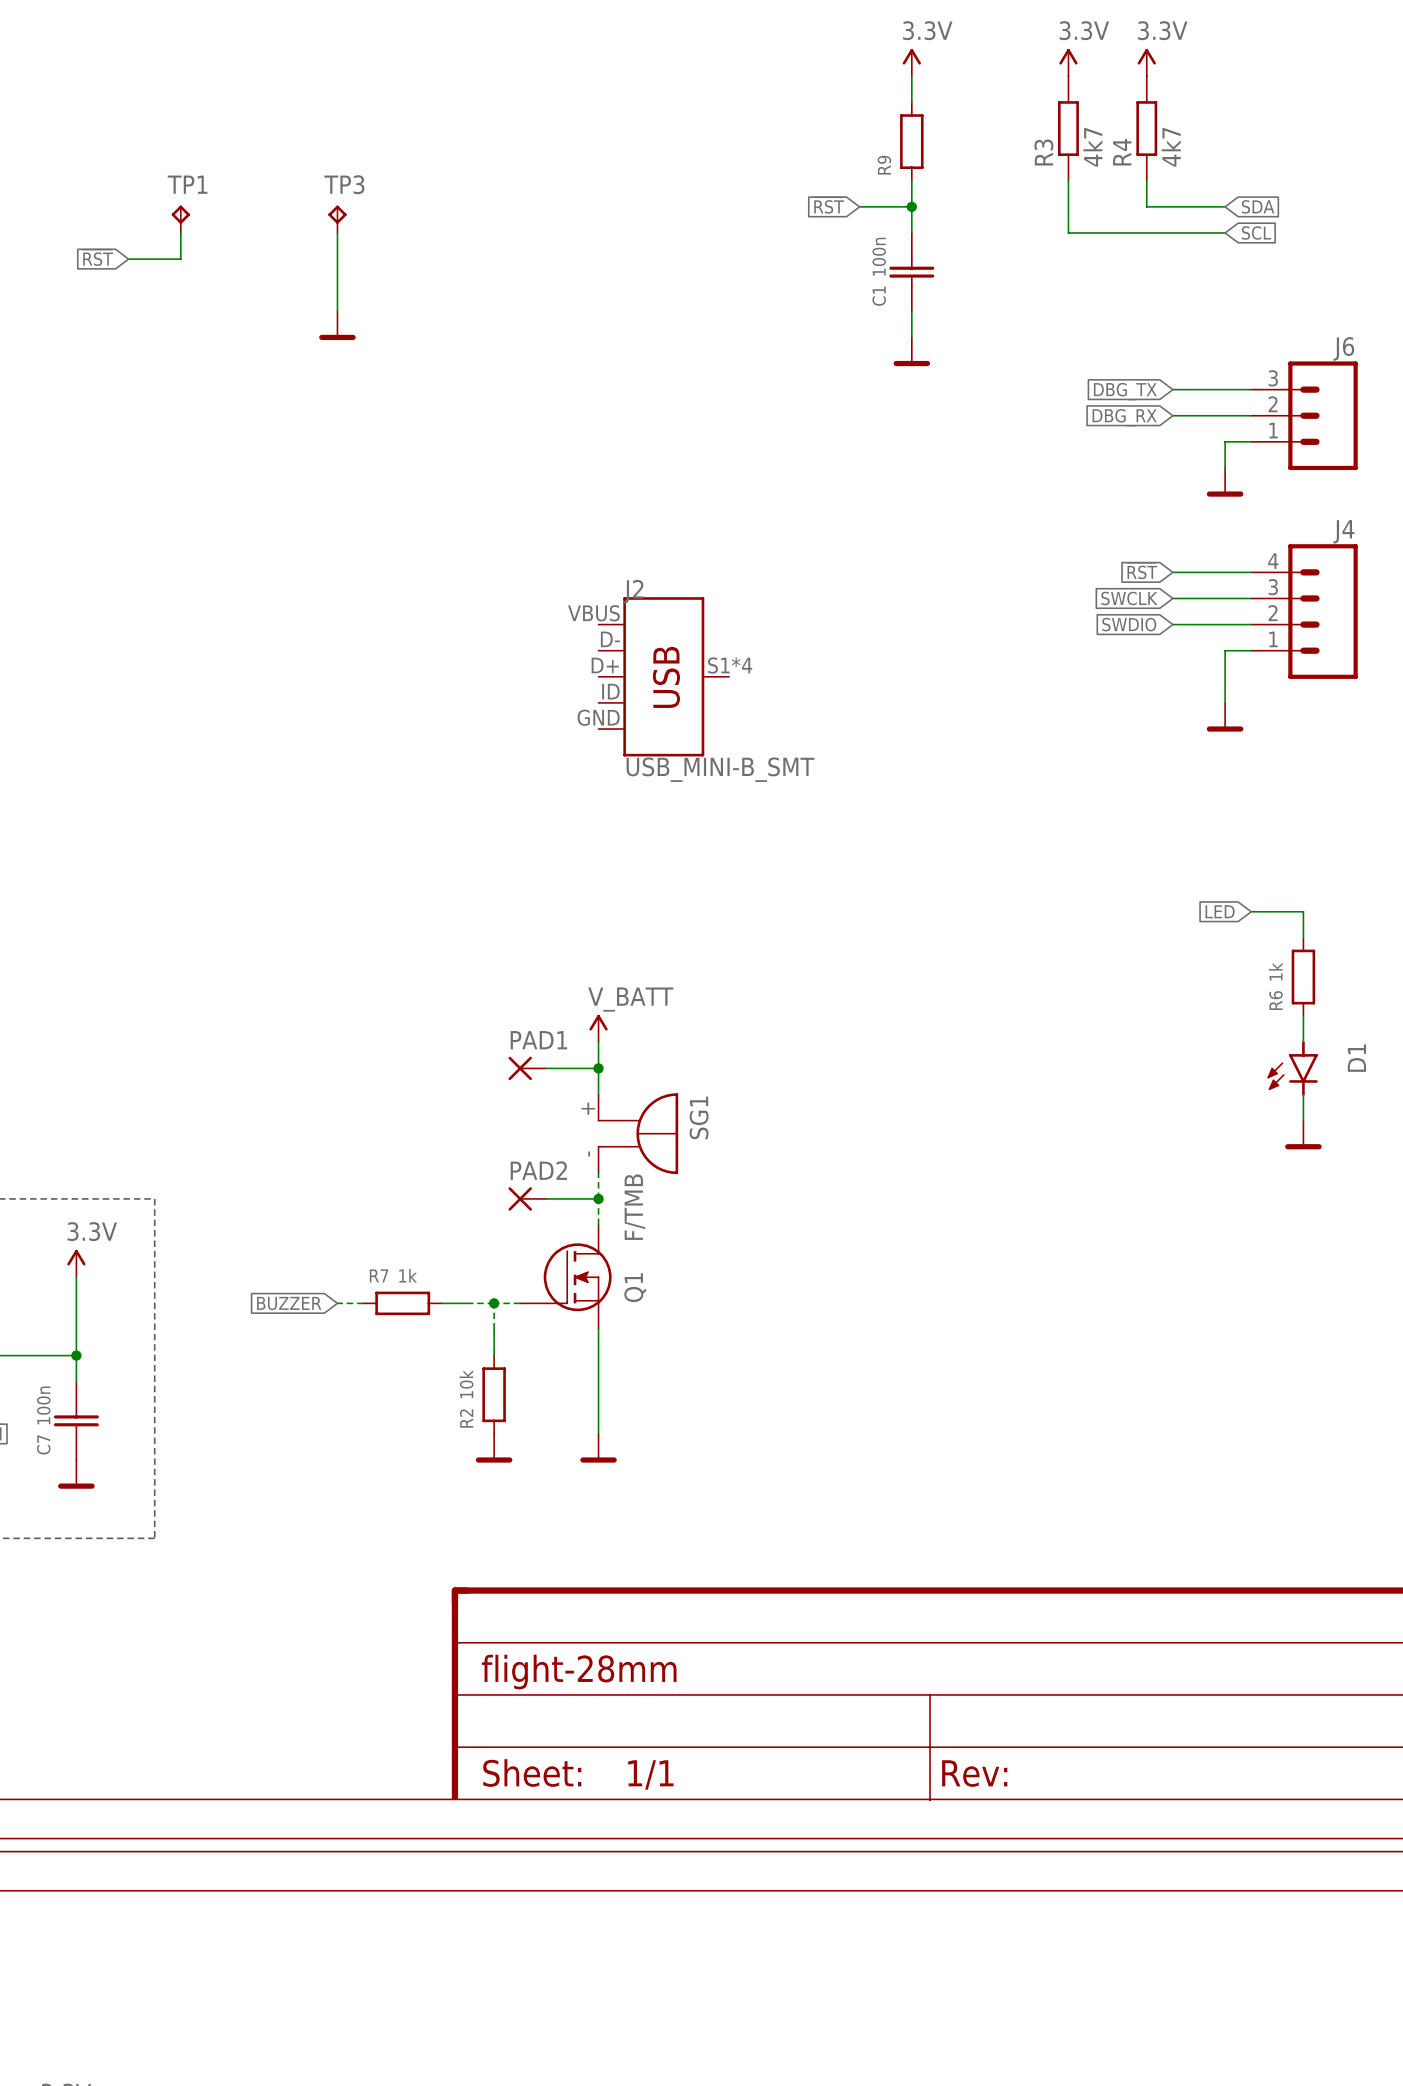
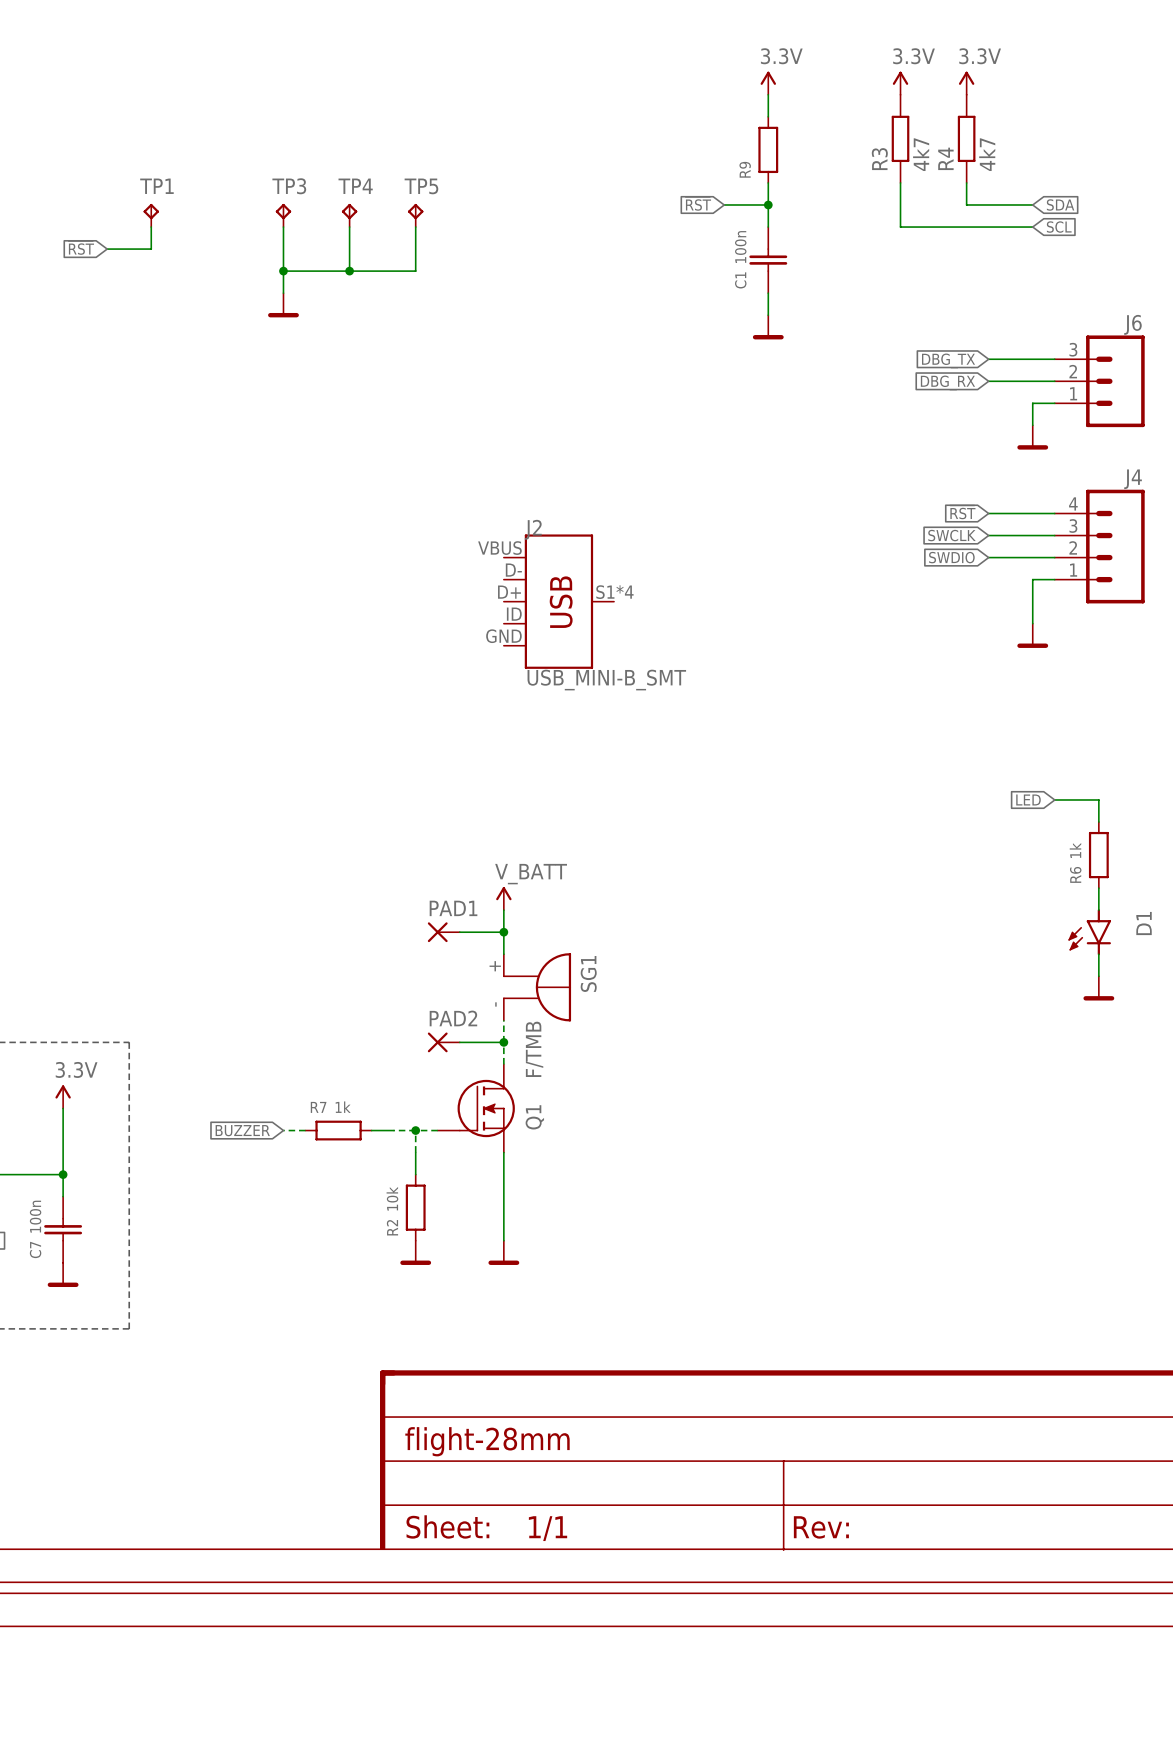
TP4: none -> (349, 215)
TP5: none -> (415, 215)
wire: none -> (349, 227) (349, 271)
wire: none -> (415, 227) (415, 271) (283, 271)
junction: none -> (283, 271)
junction: none -> (349, 271)

